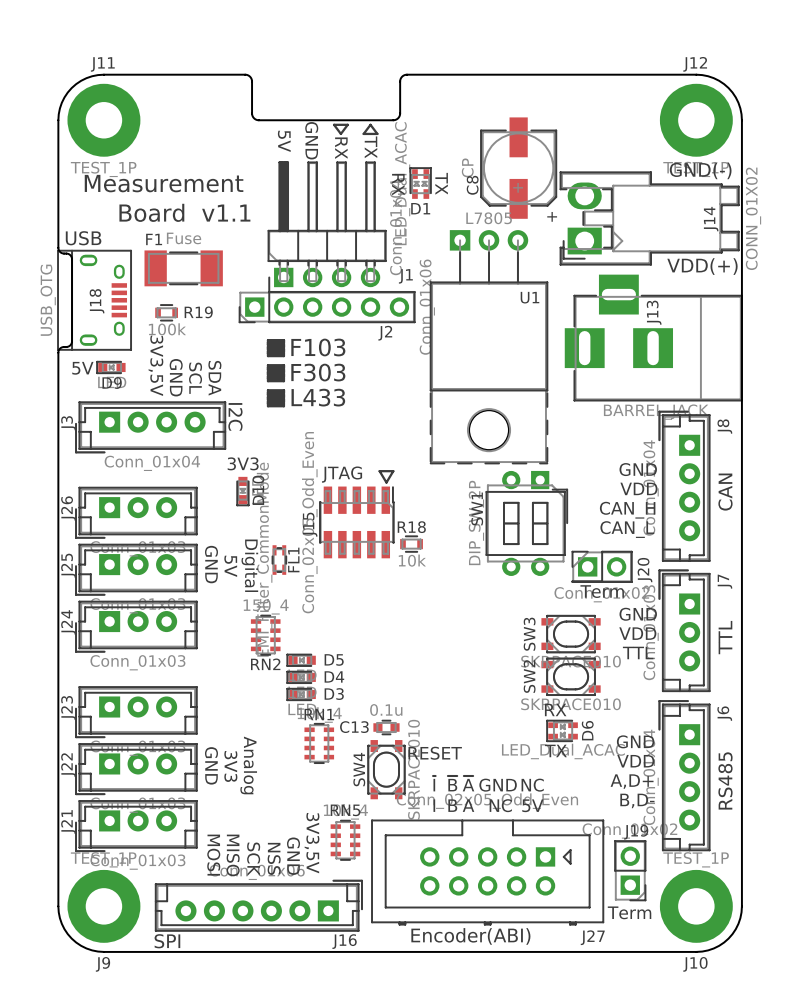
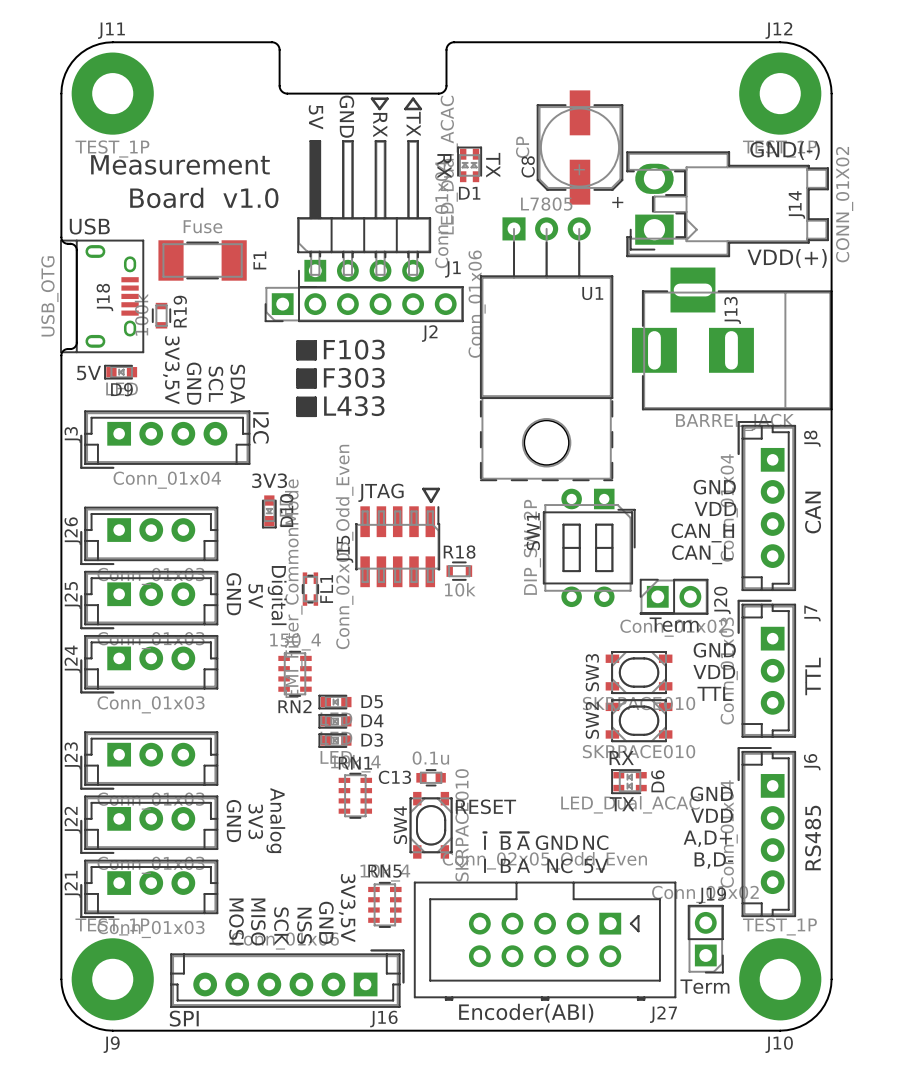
text: v1.1 (226, 213) -> v1.0 (250, 198)
F1 name rotation: 0° (154, 239) -> 90° counterclockwise (259, 260)
F1 name position: F1 (154, 239) -> F1 (259, 260)
R19 rotation: 0° (166, 312) -> 90° clockwise (161, 315)
R19 position: (166, 312) -> (161, 315)

